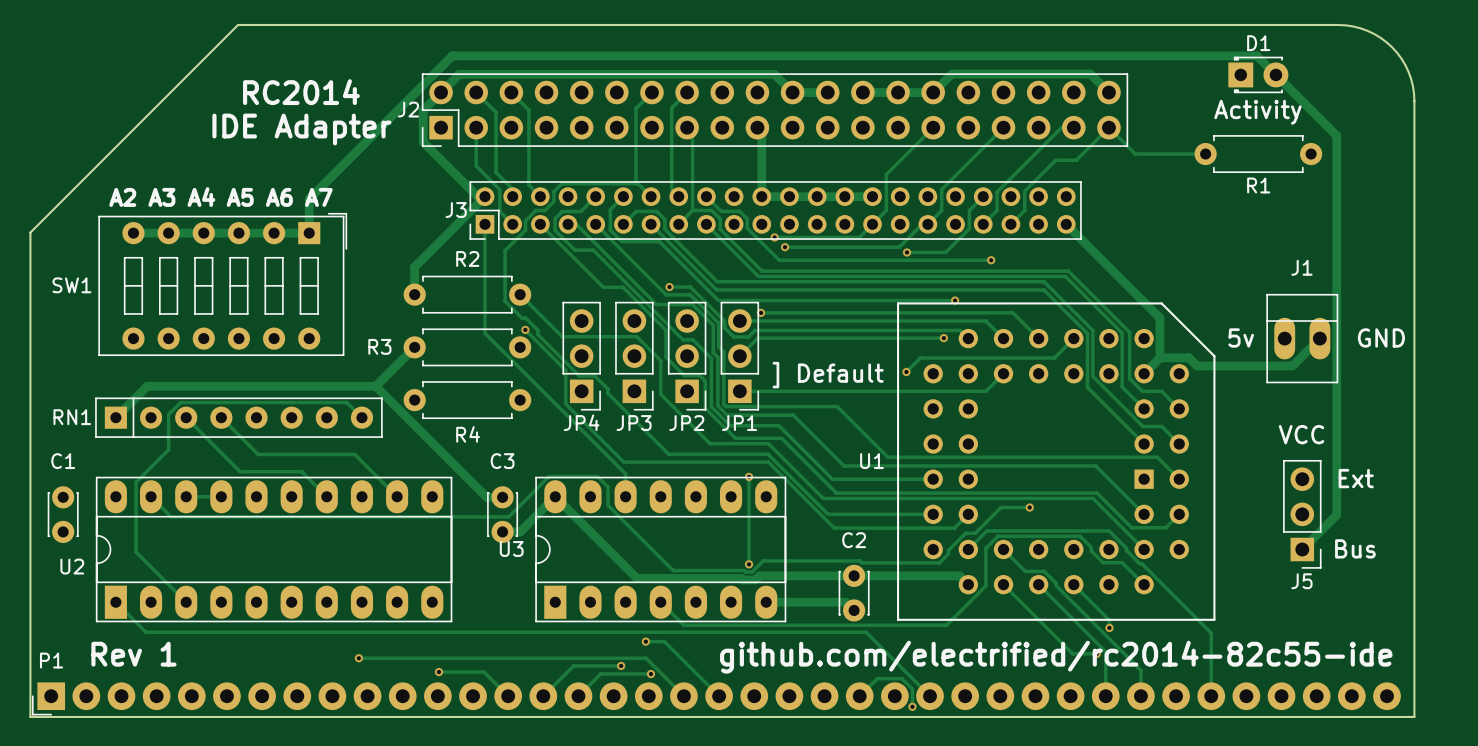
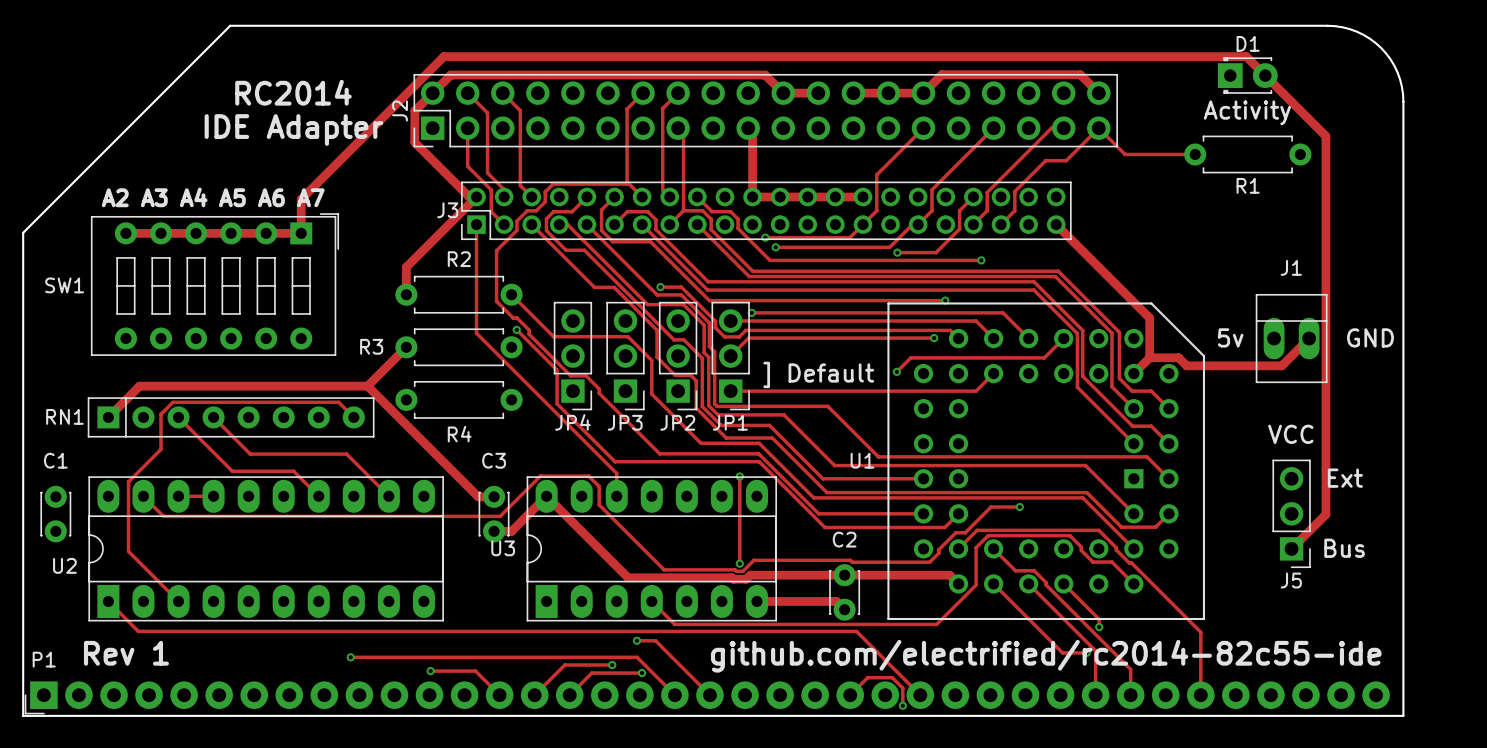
J2 name rotation: 0° (408, 109) -> 90° counterclockwise (400, 110)

